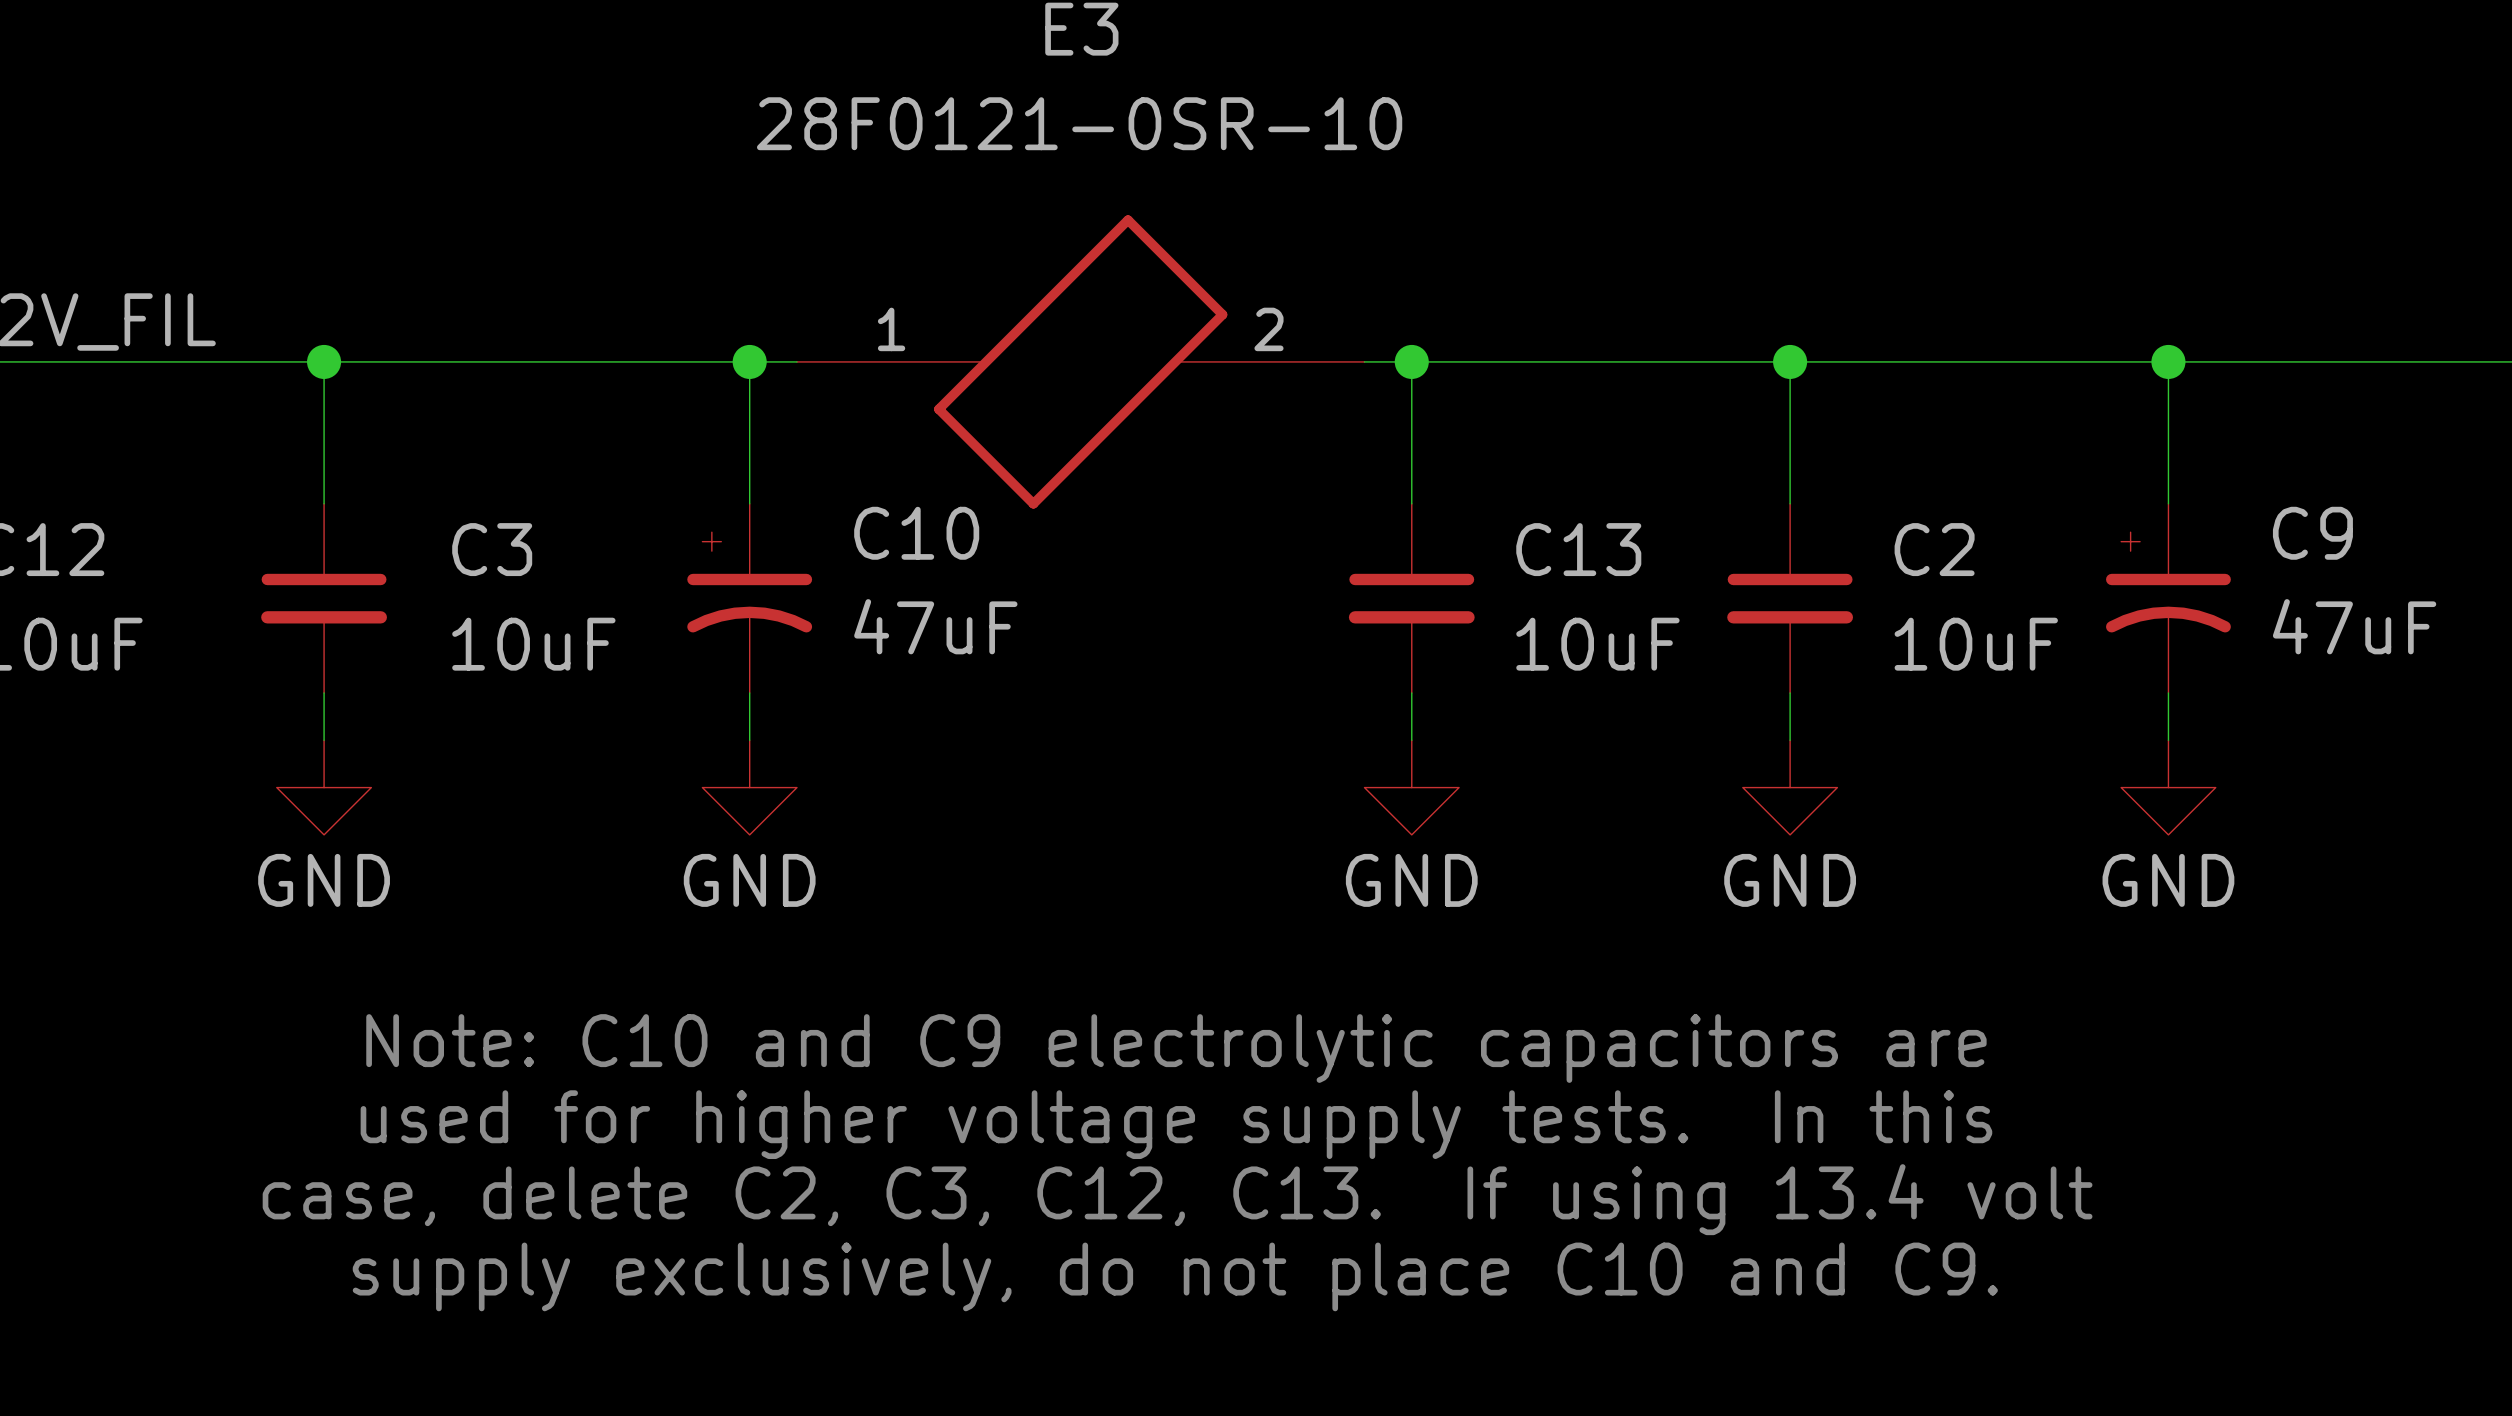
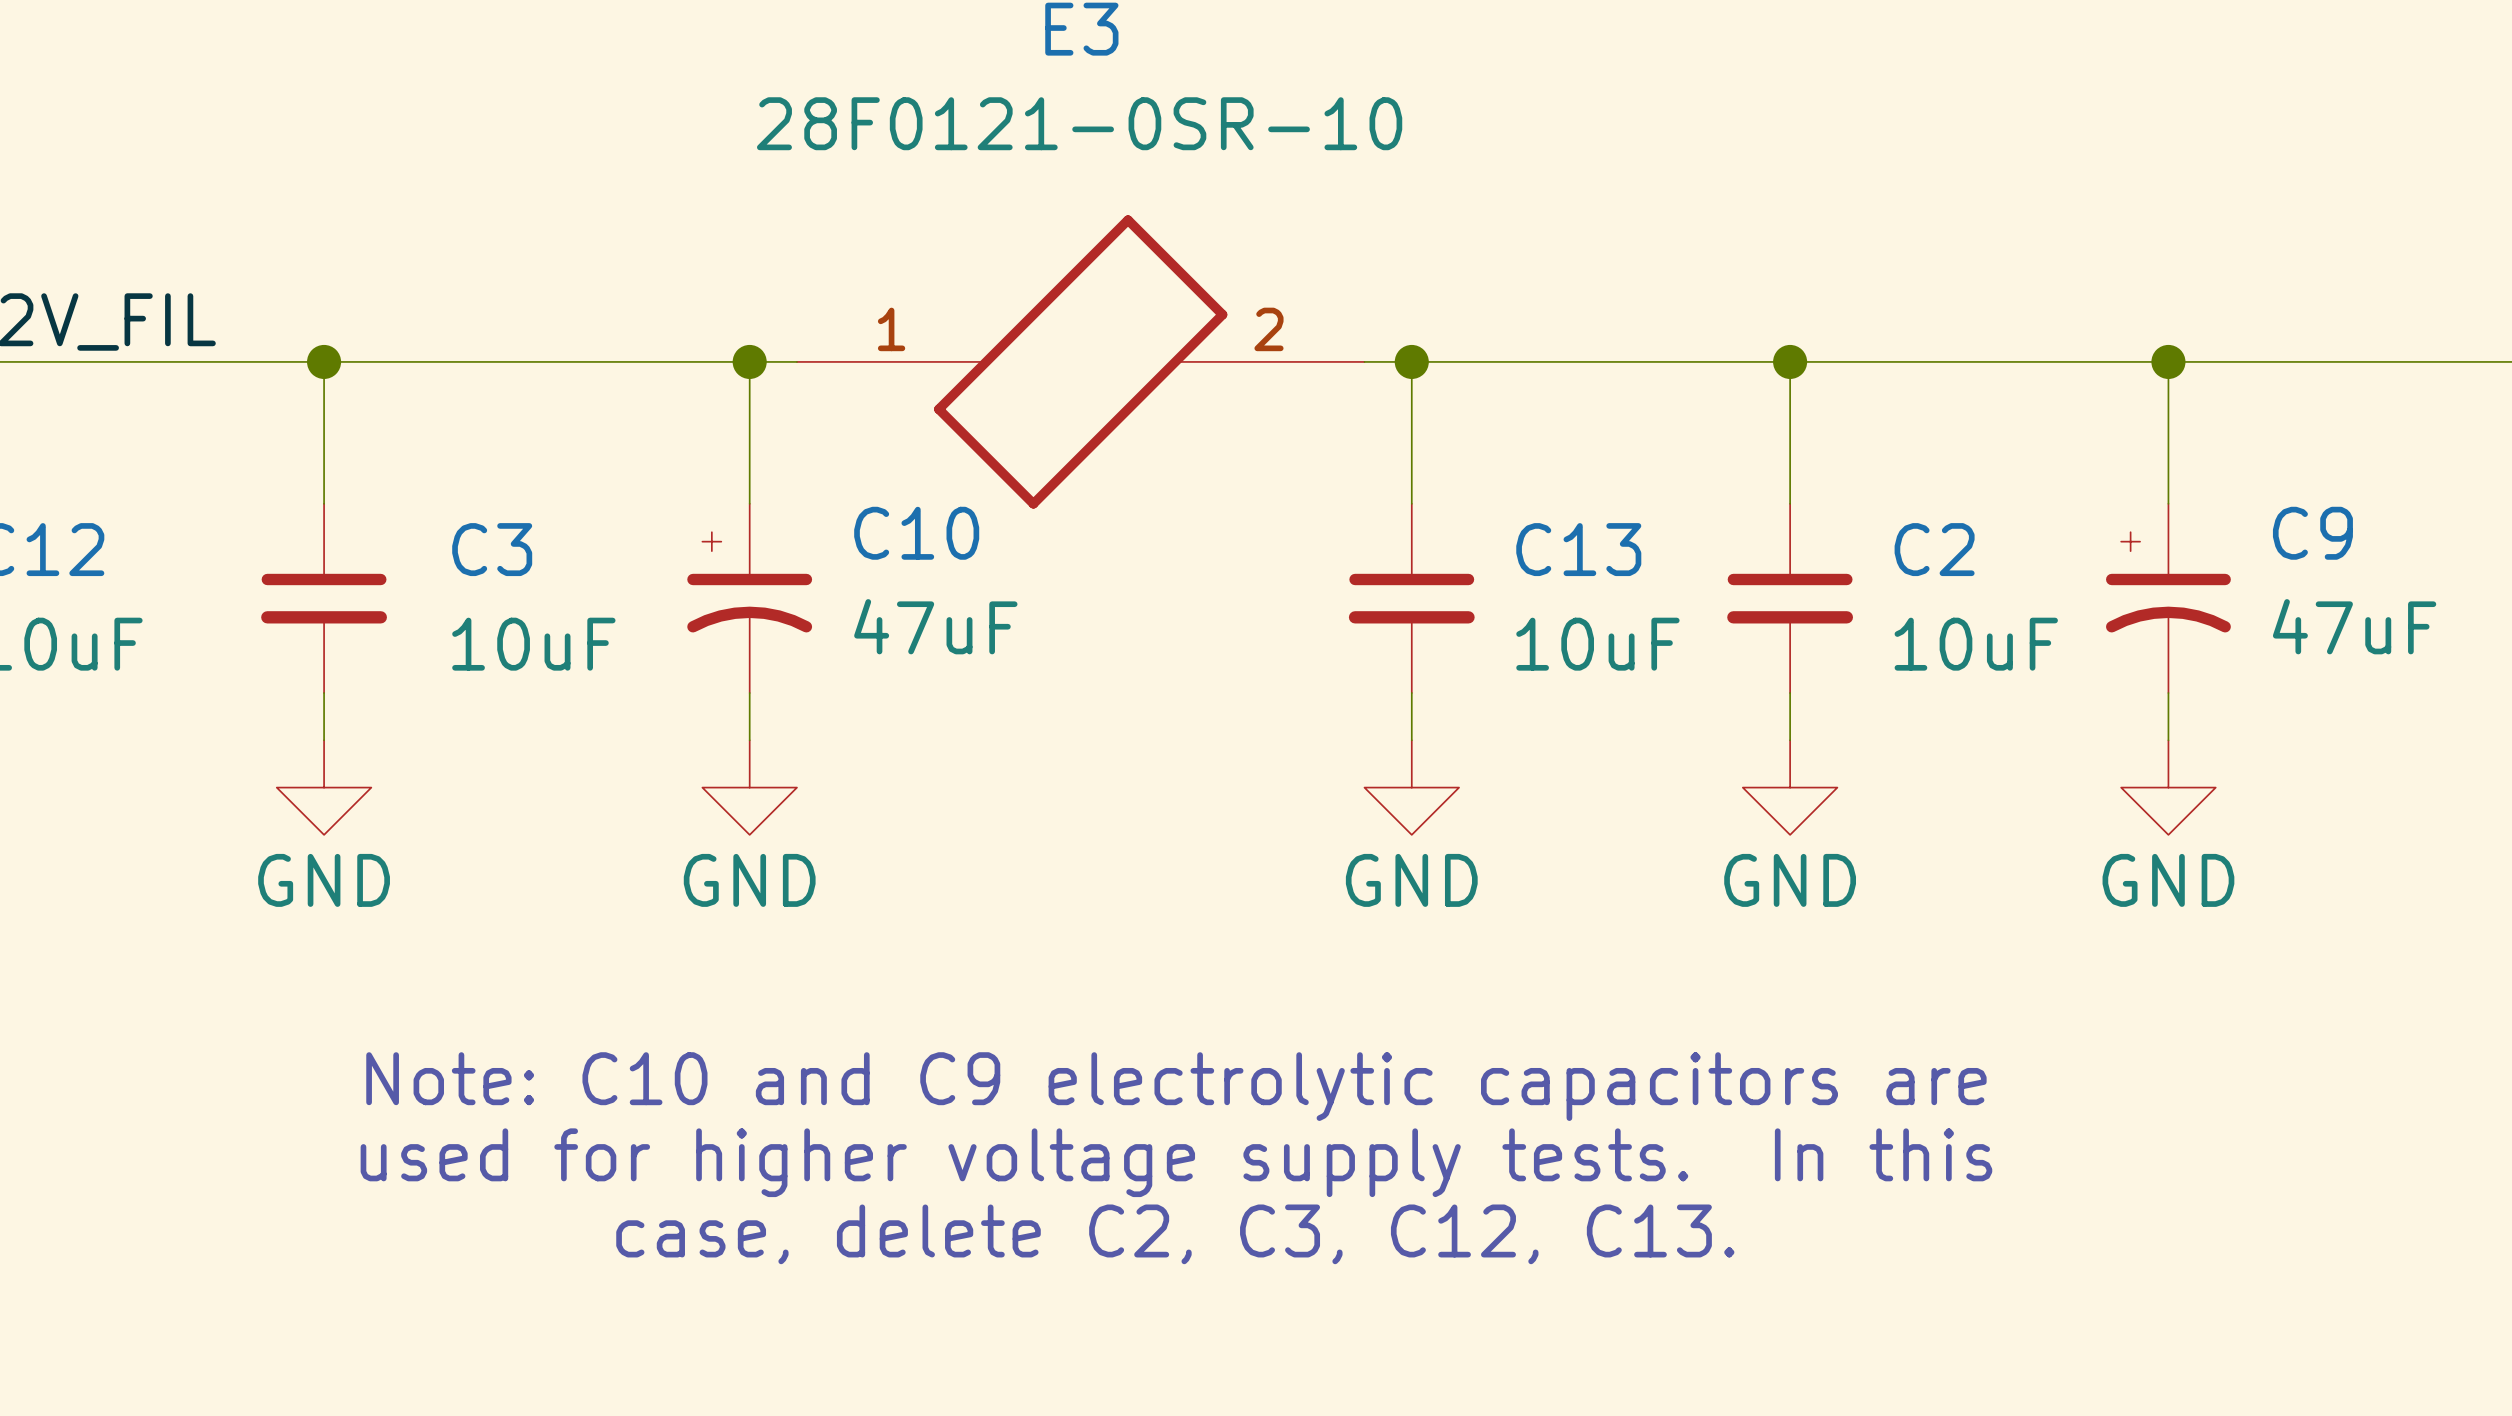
text position: Note: C10 and C9 electrolytic capacitors are (1176, 1048) -> Note: C10 and C9 electrolytic capacitors are (1176, 1086)
text position: used for higher voltage supply tests. In this (1176, 1124) -> used for higher voltage supply tests. In this (1176, 1162)
text: case, delete C2, C3, C12, C13. If using 13.4 volt (1177, 1199) -> case, delete C2, C3, C12, C13. (1175, 1234)
text: supply exclusively, do not place C10 and C9. (1175, 1276) -> none

